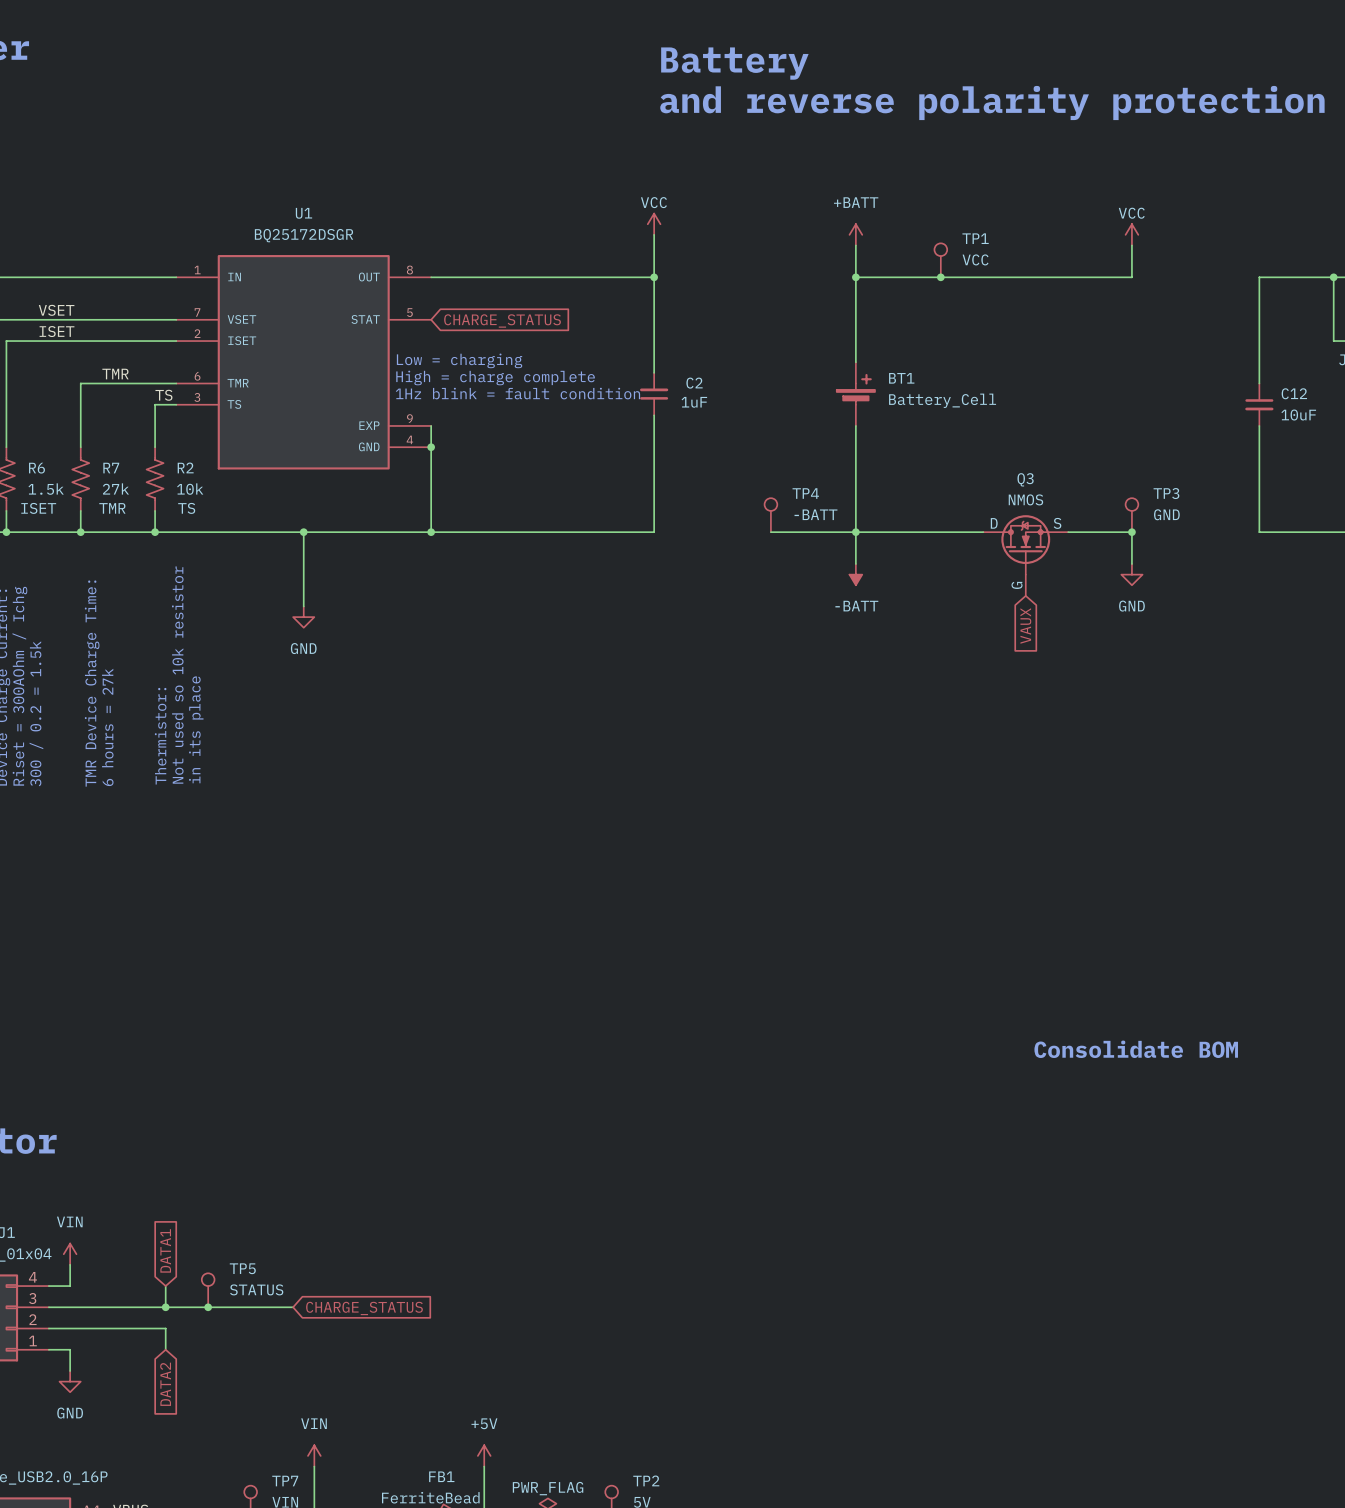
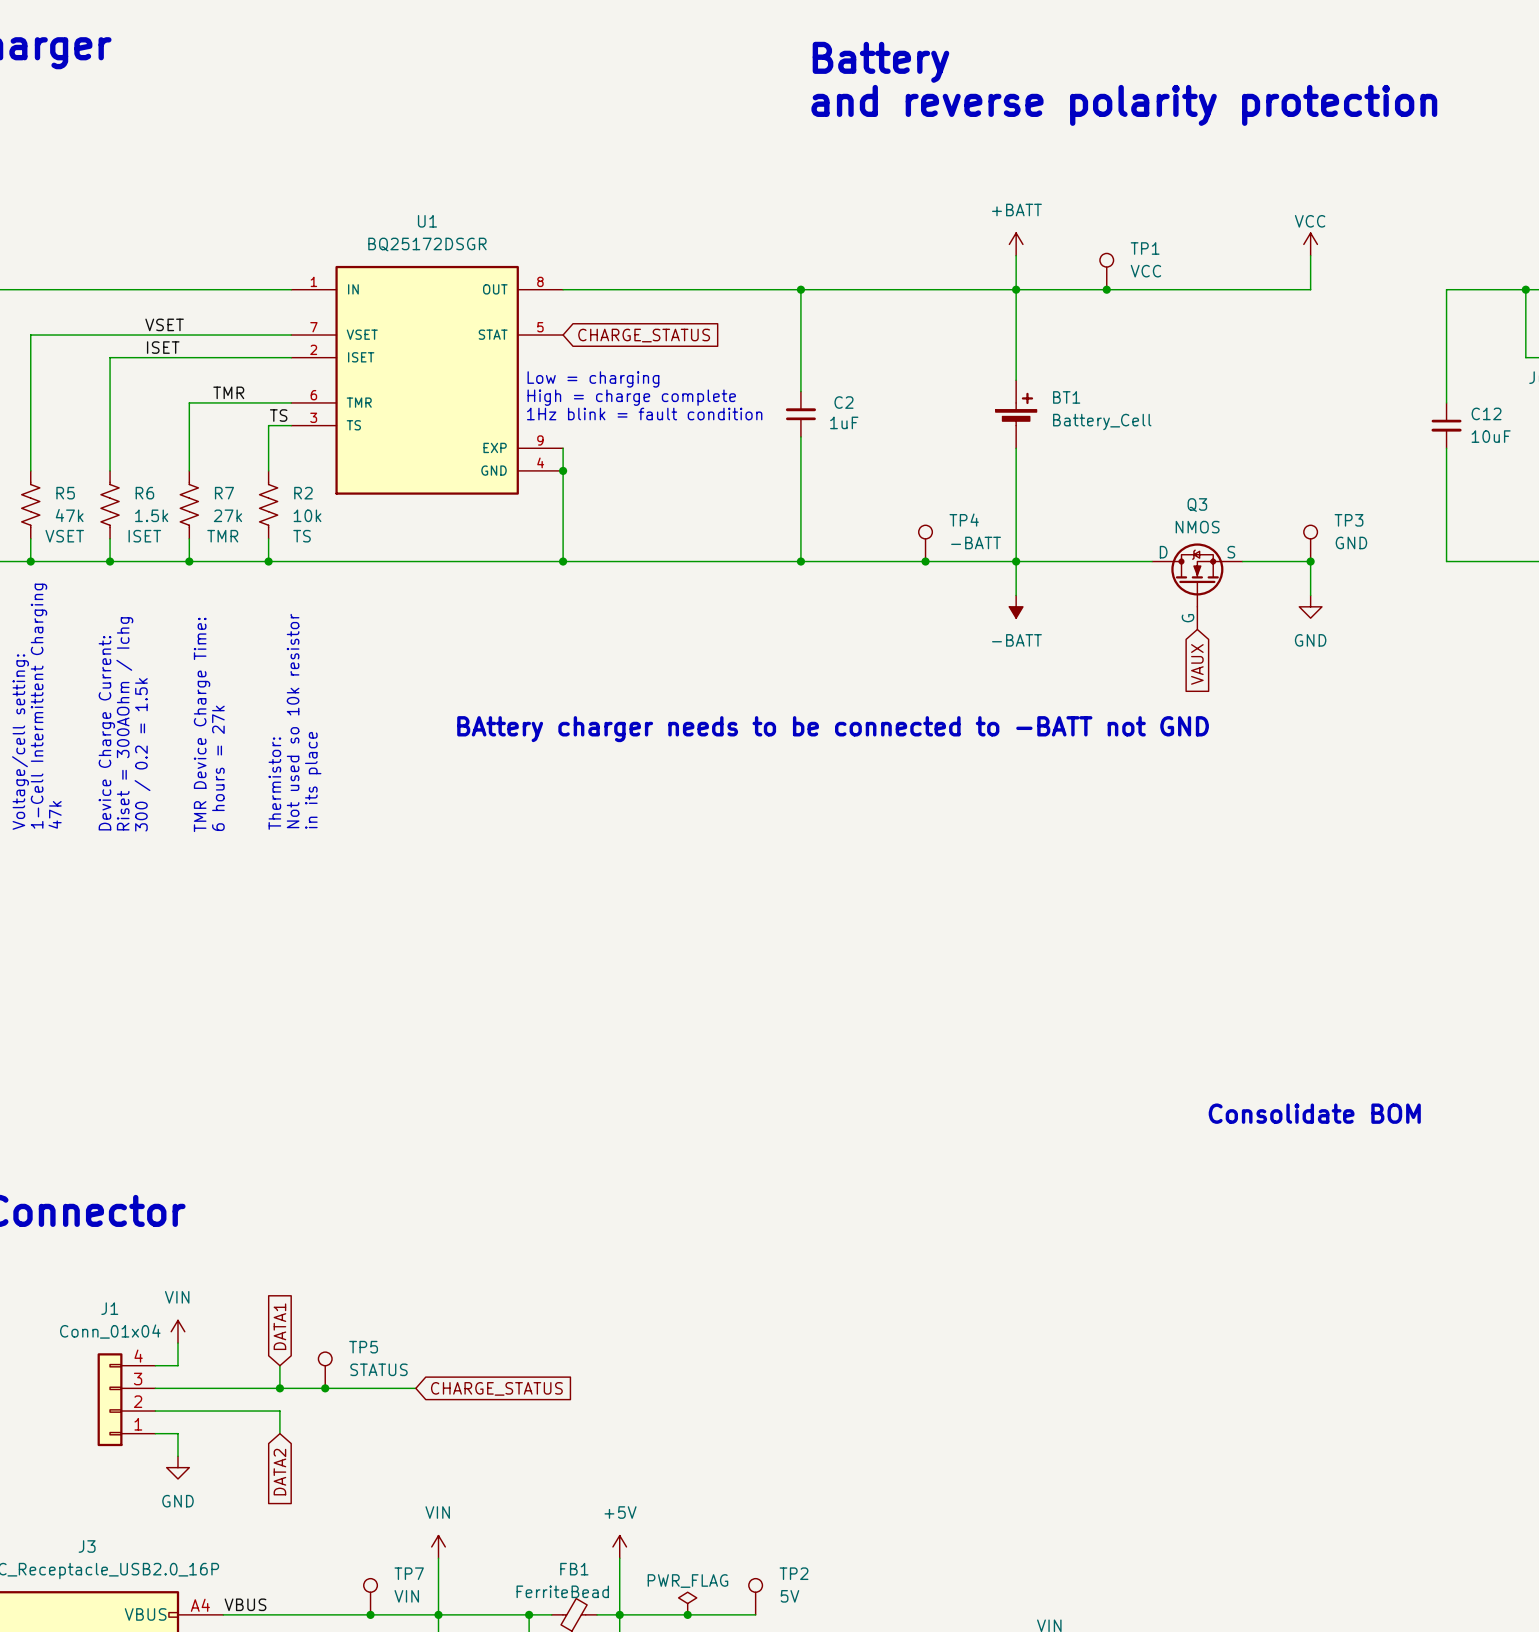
power symbol: VCC (654, 224) -> none
wire: (654, 234) (654, 277) -> (1016, 289) (800, 289)
wire: (303, 532) (303, 606) -> none
junction: (303, 532) -> none
wire: none -> (800, 561) (925, 561)
junction: none -> (800, 561)
junction: none -> (925, 561)
power symbol: GND (303, 617) -> none
text: none -> BAttery charger needs to be connected to -BATT not GND (833, 729)

